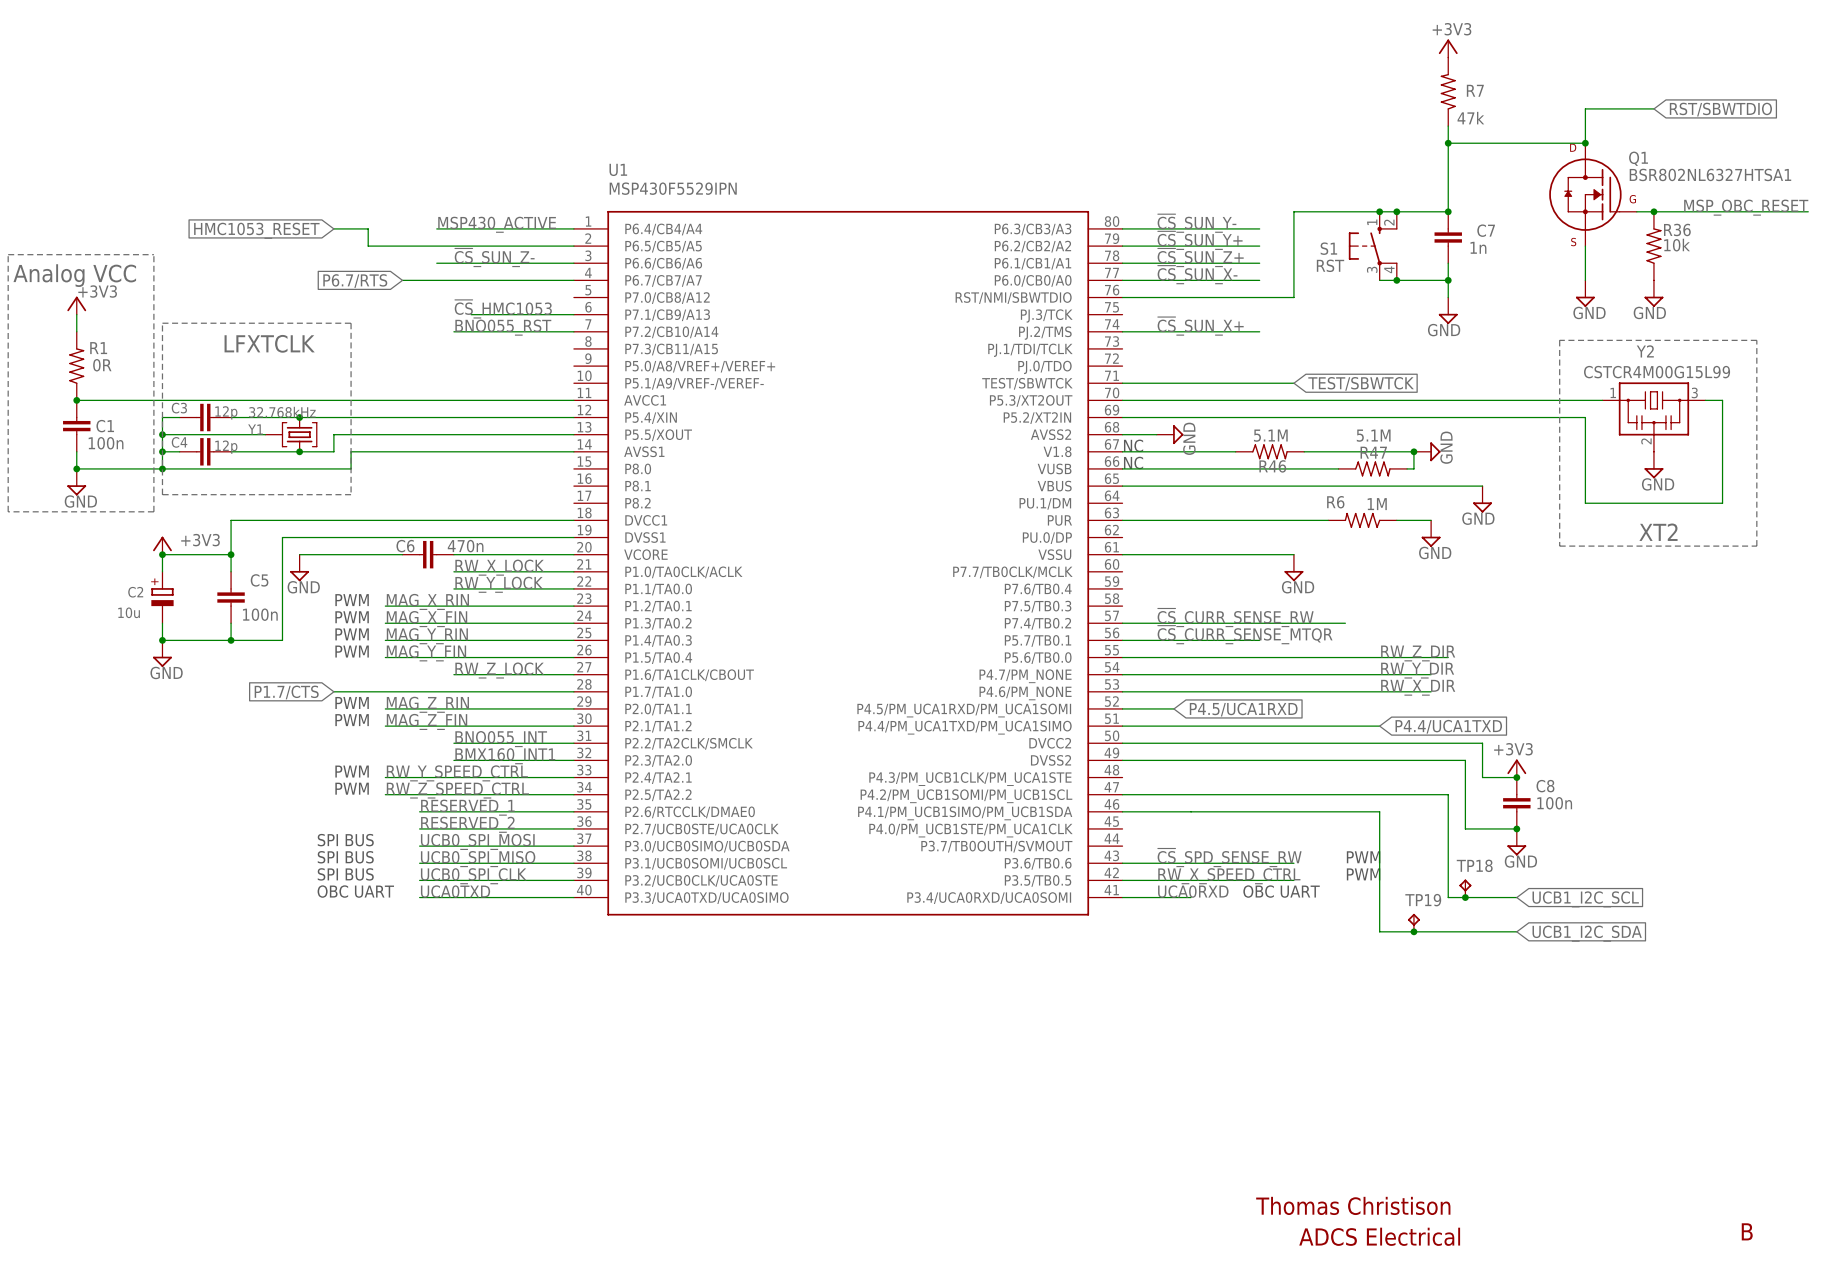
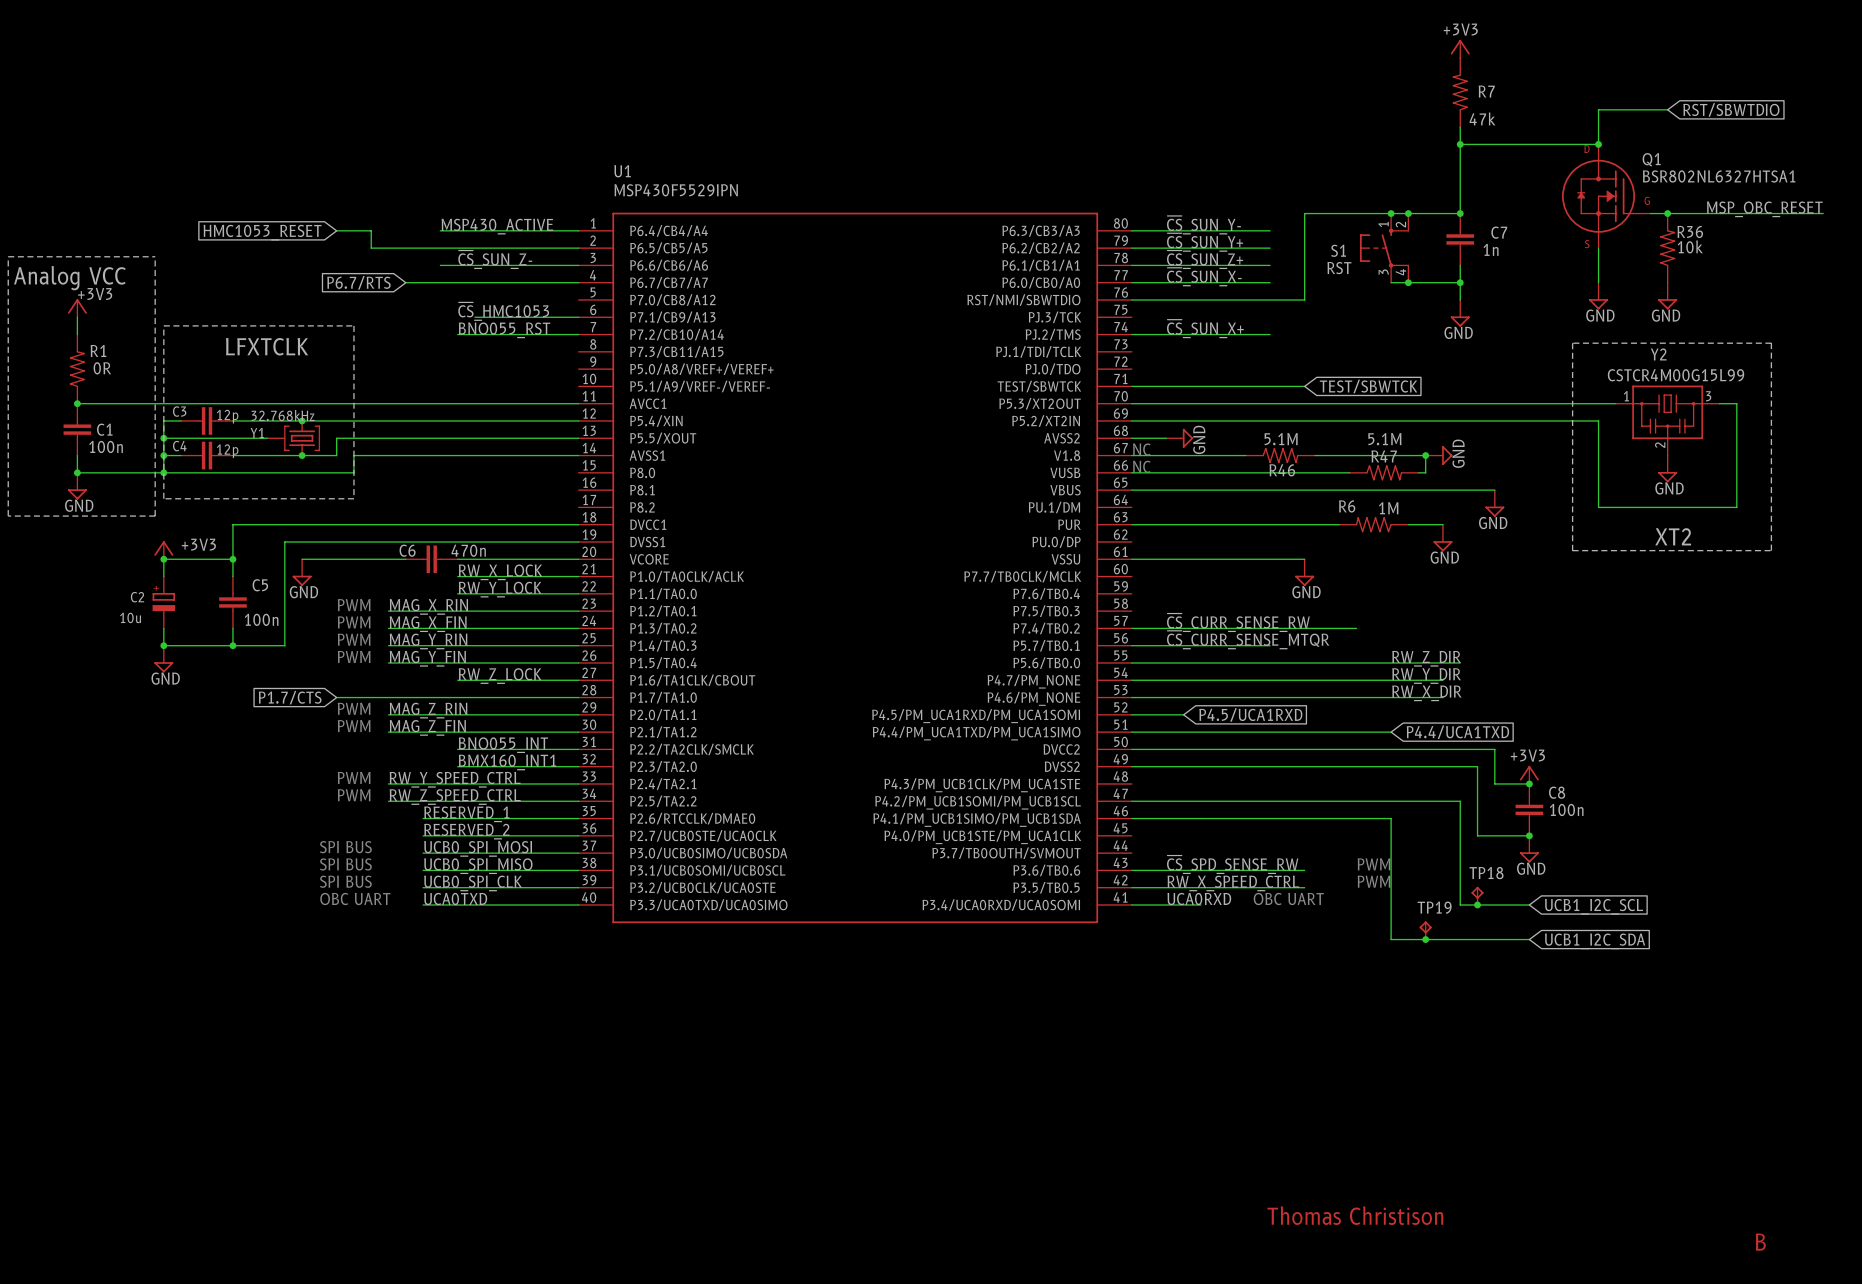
text: ADCS Electrical (1379, 1236) -> none

